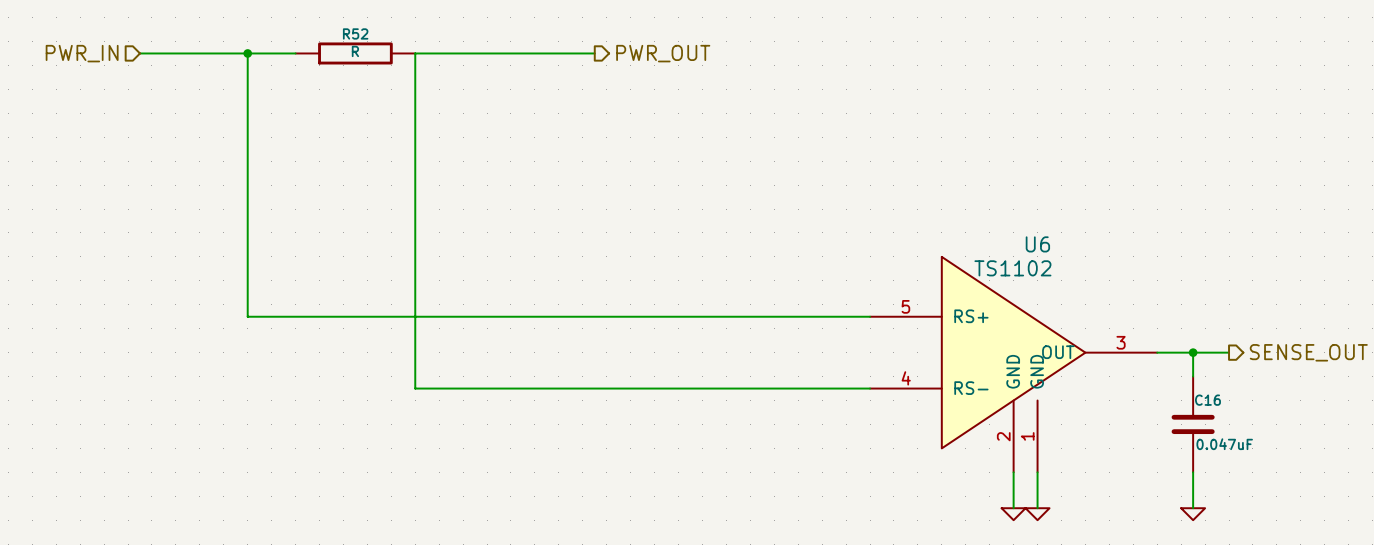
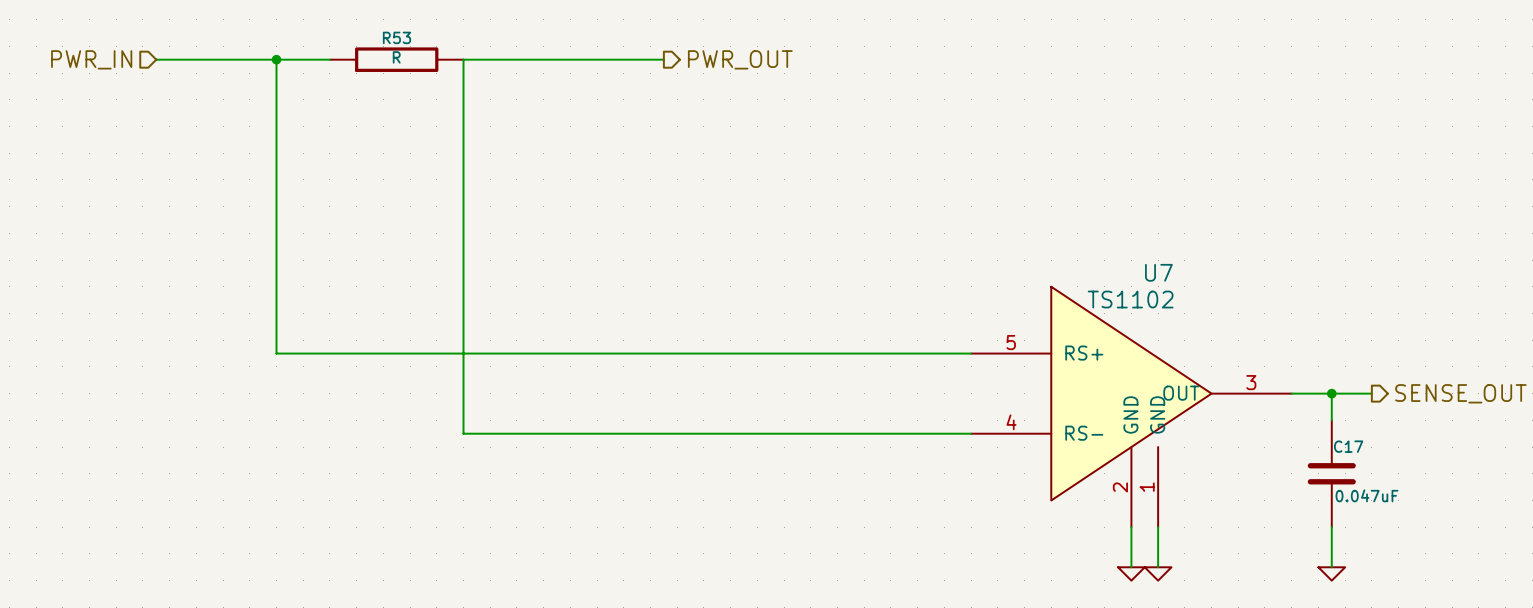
R52 name: R52 (355, 33) -> R53 (396, 37)
U6 name: U6 (1037, 244) -> U7 (1158, 272)
C16 name: C16 (1207, 400) -> C17 (1348, 446)

